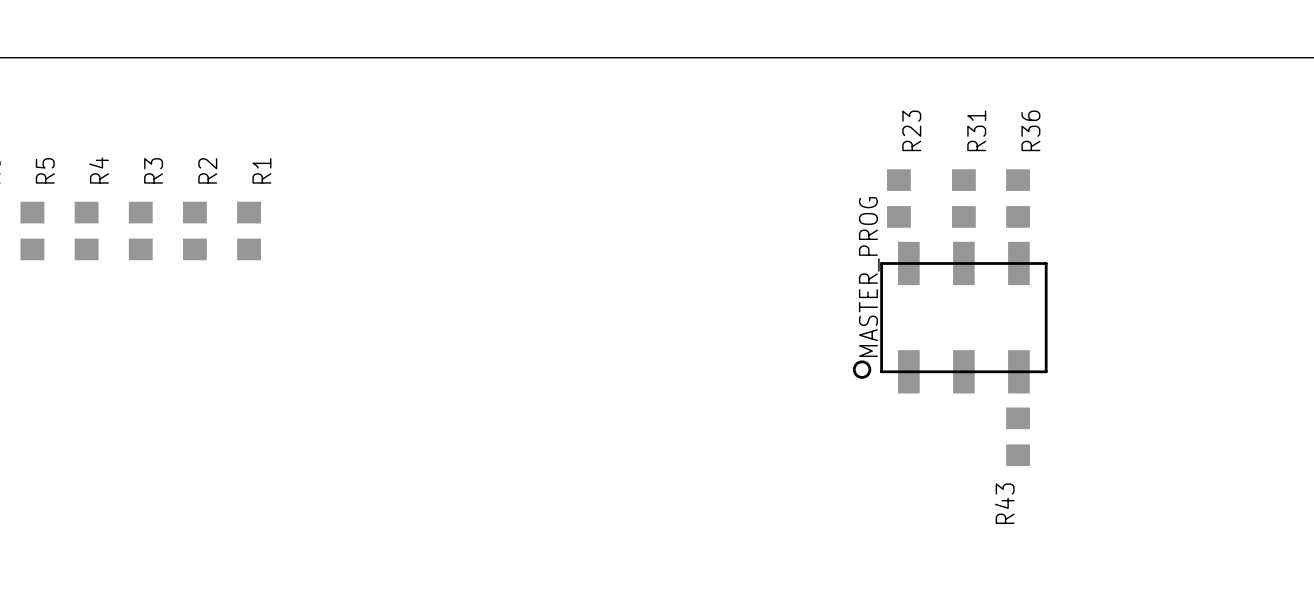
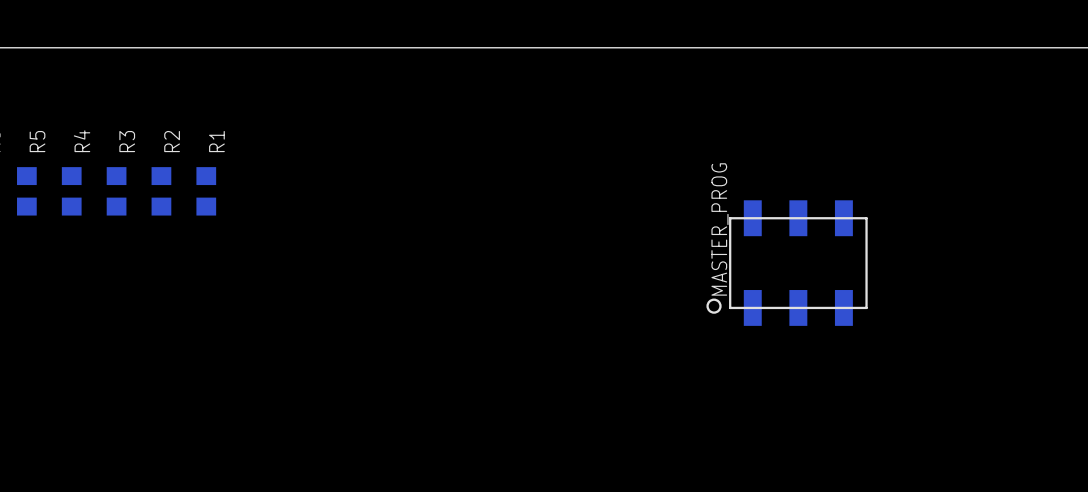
R23: (898, 198) -> none
R31: (963, 198) -> none
R36: (1018, 198) -> none
R43: (1018, 436) -> none

